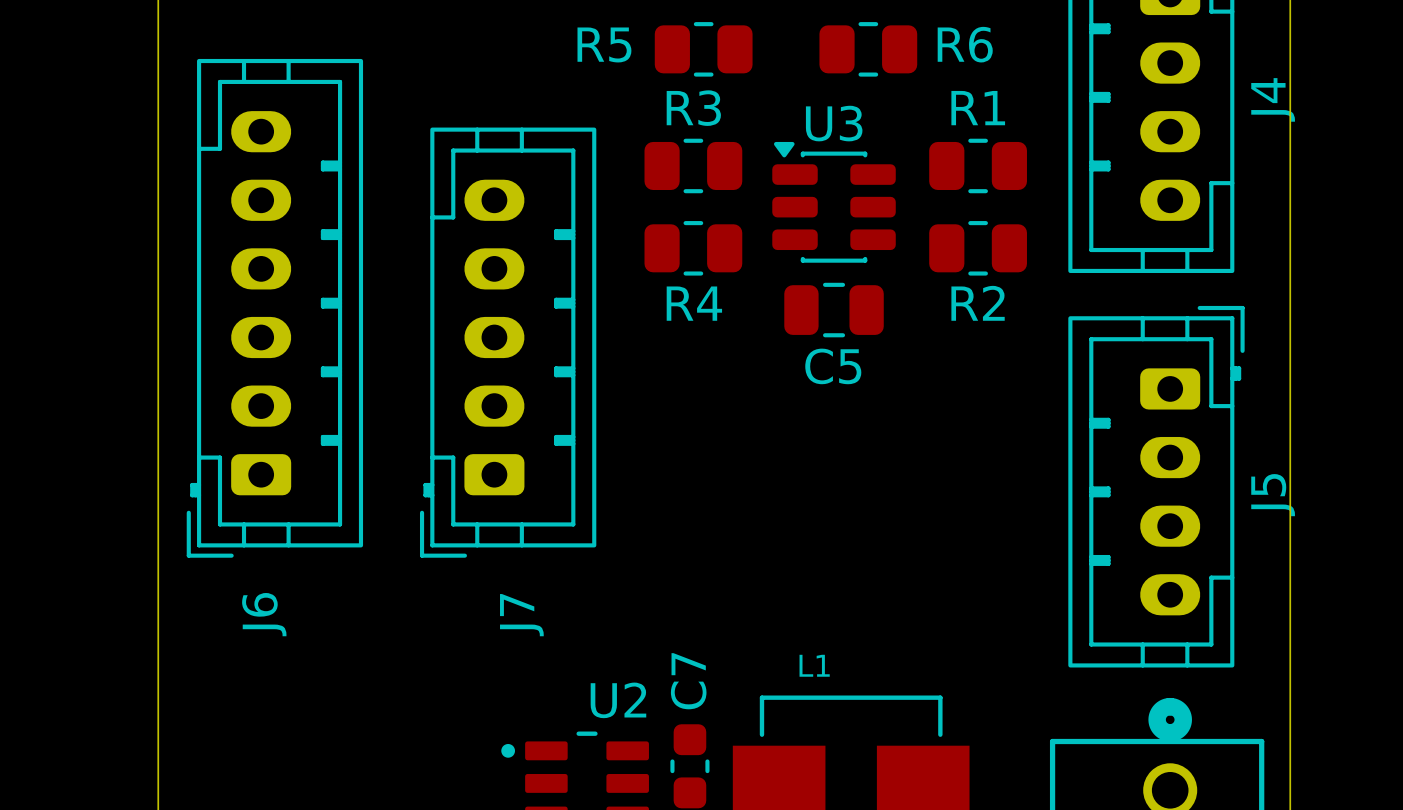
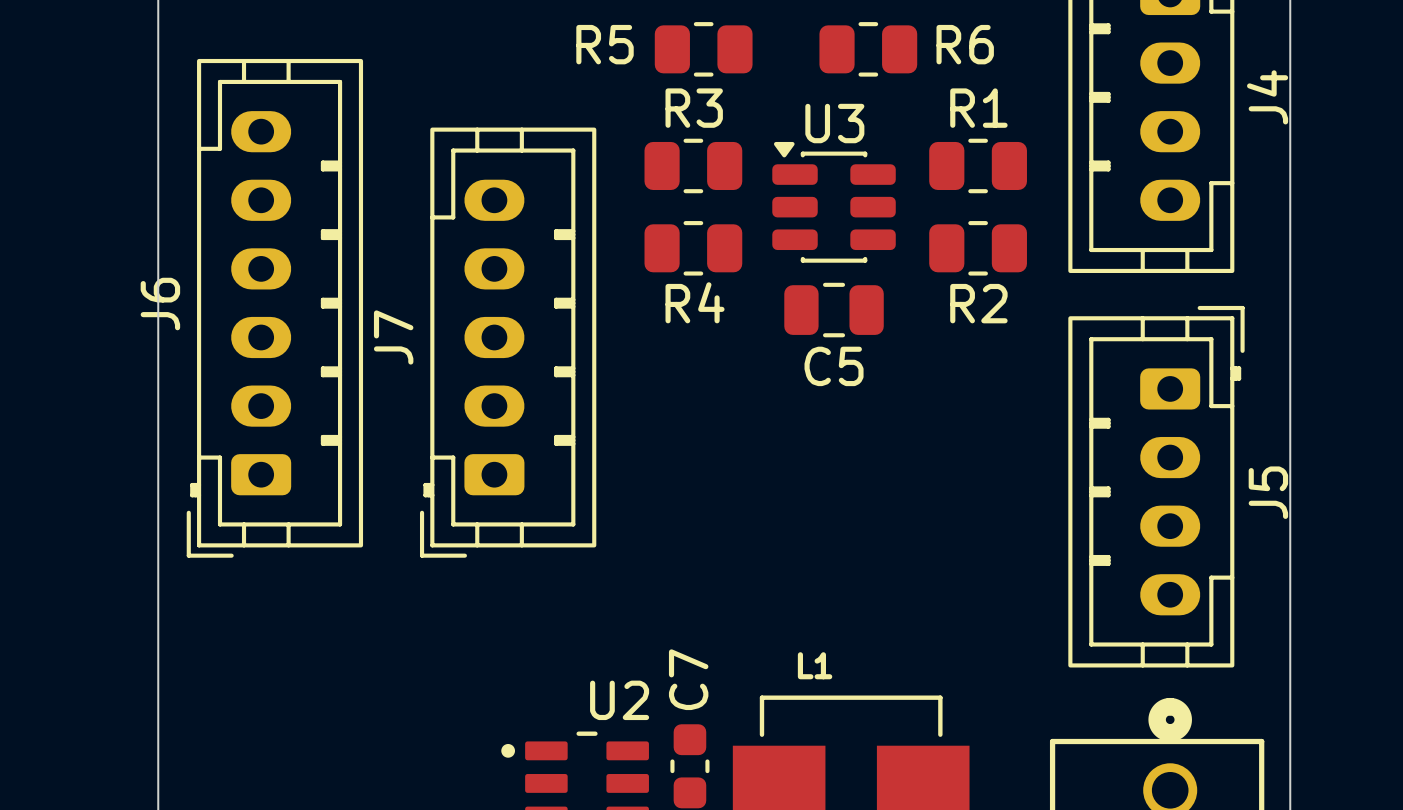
J6 name position: J6 (264, 614) -> J6 (160, 304)
J7 name position: J7 (521, 615) -> J7 (393, 337)

